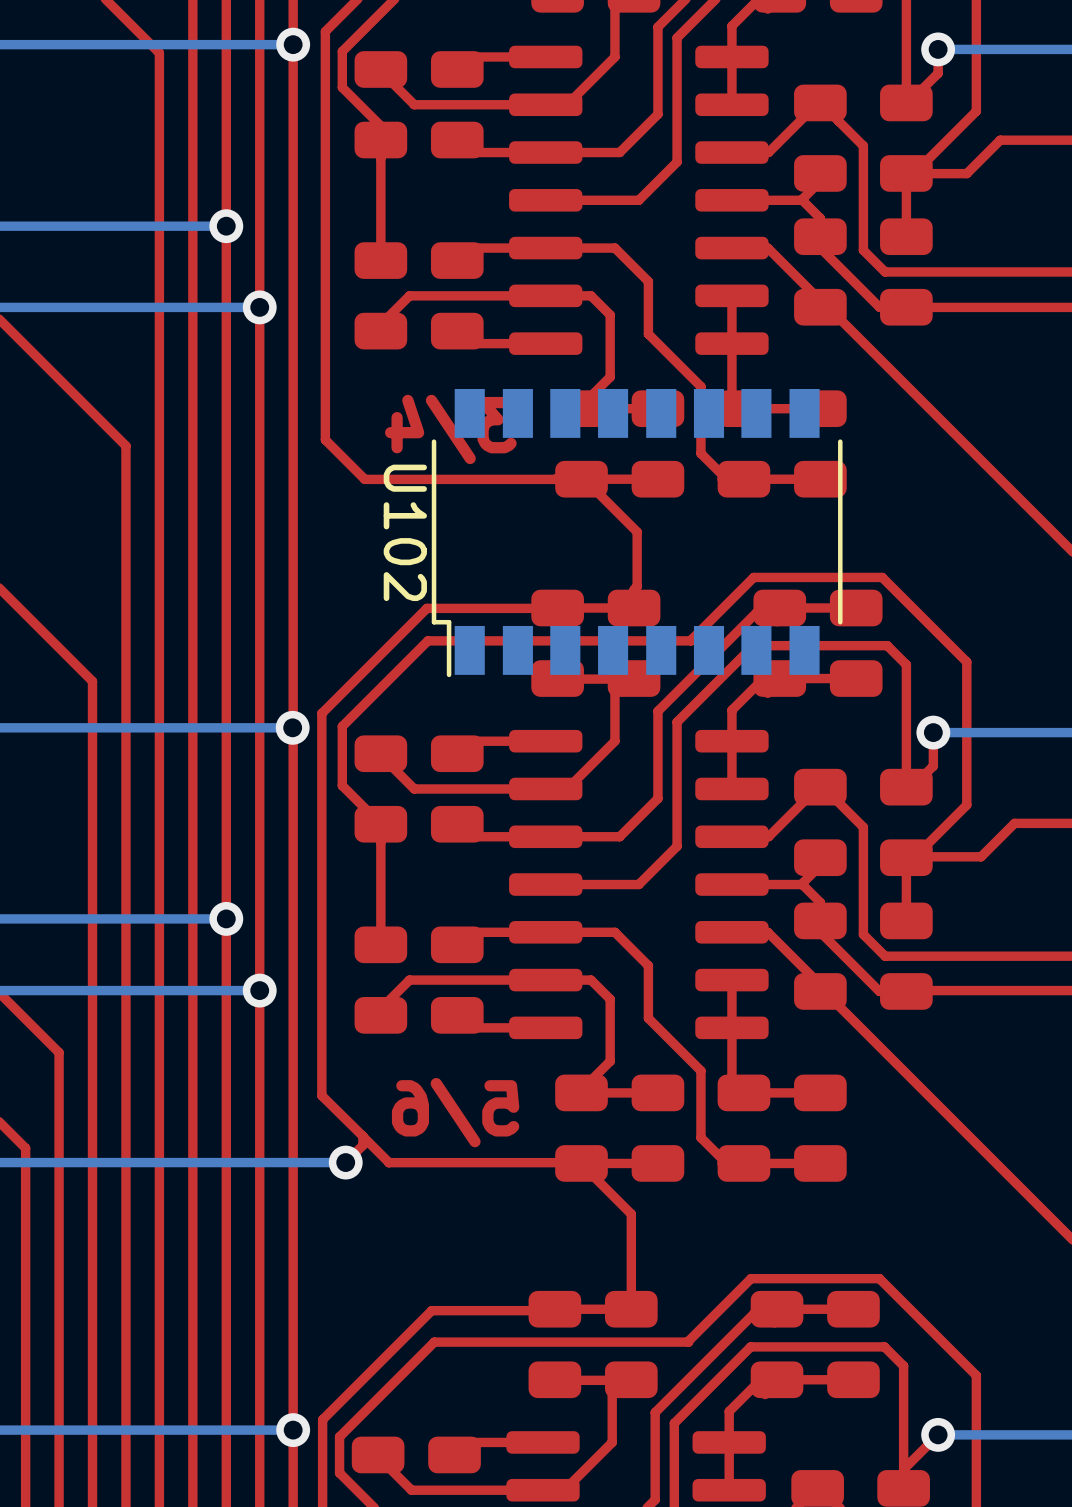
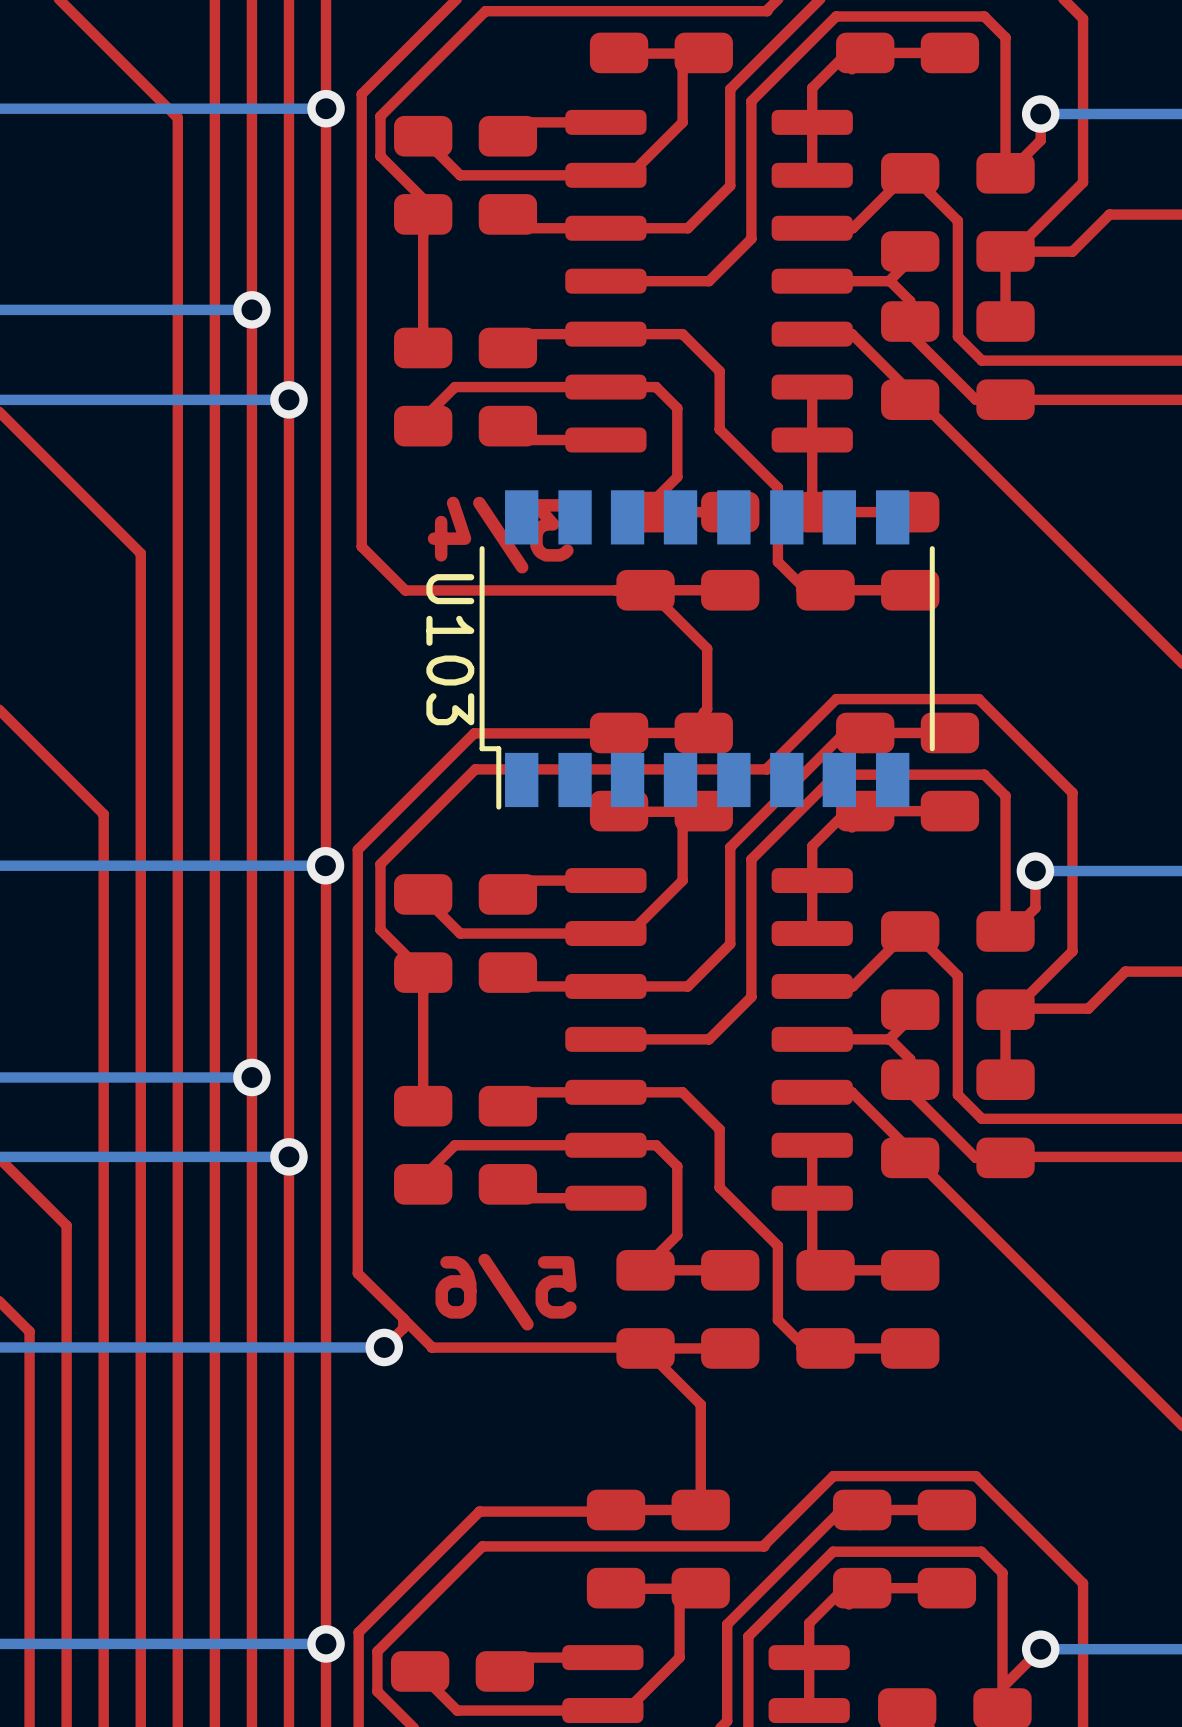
U102 name: U102 (405, 532) -> U103 (450, 649)

